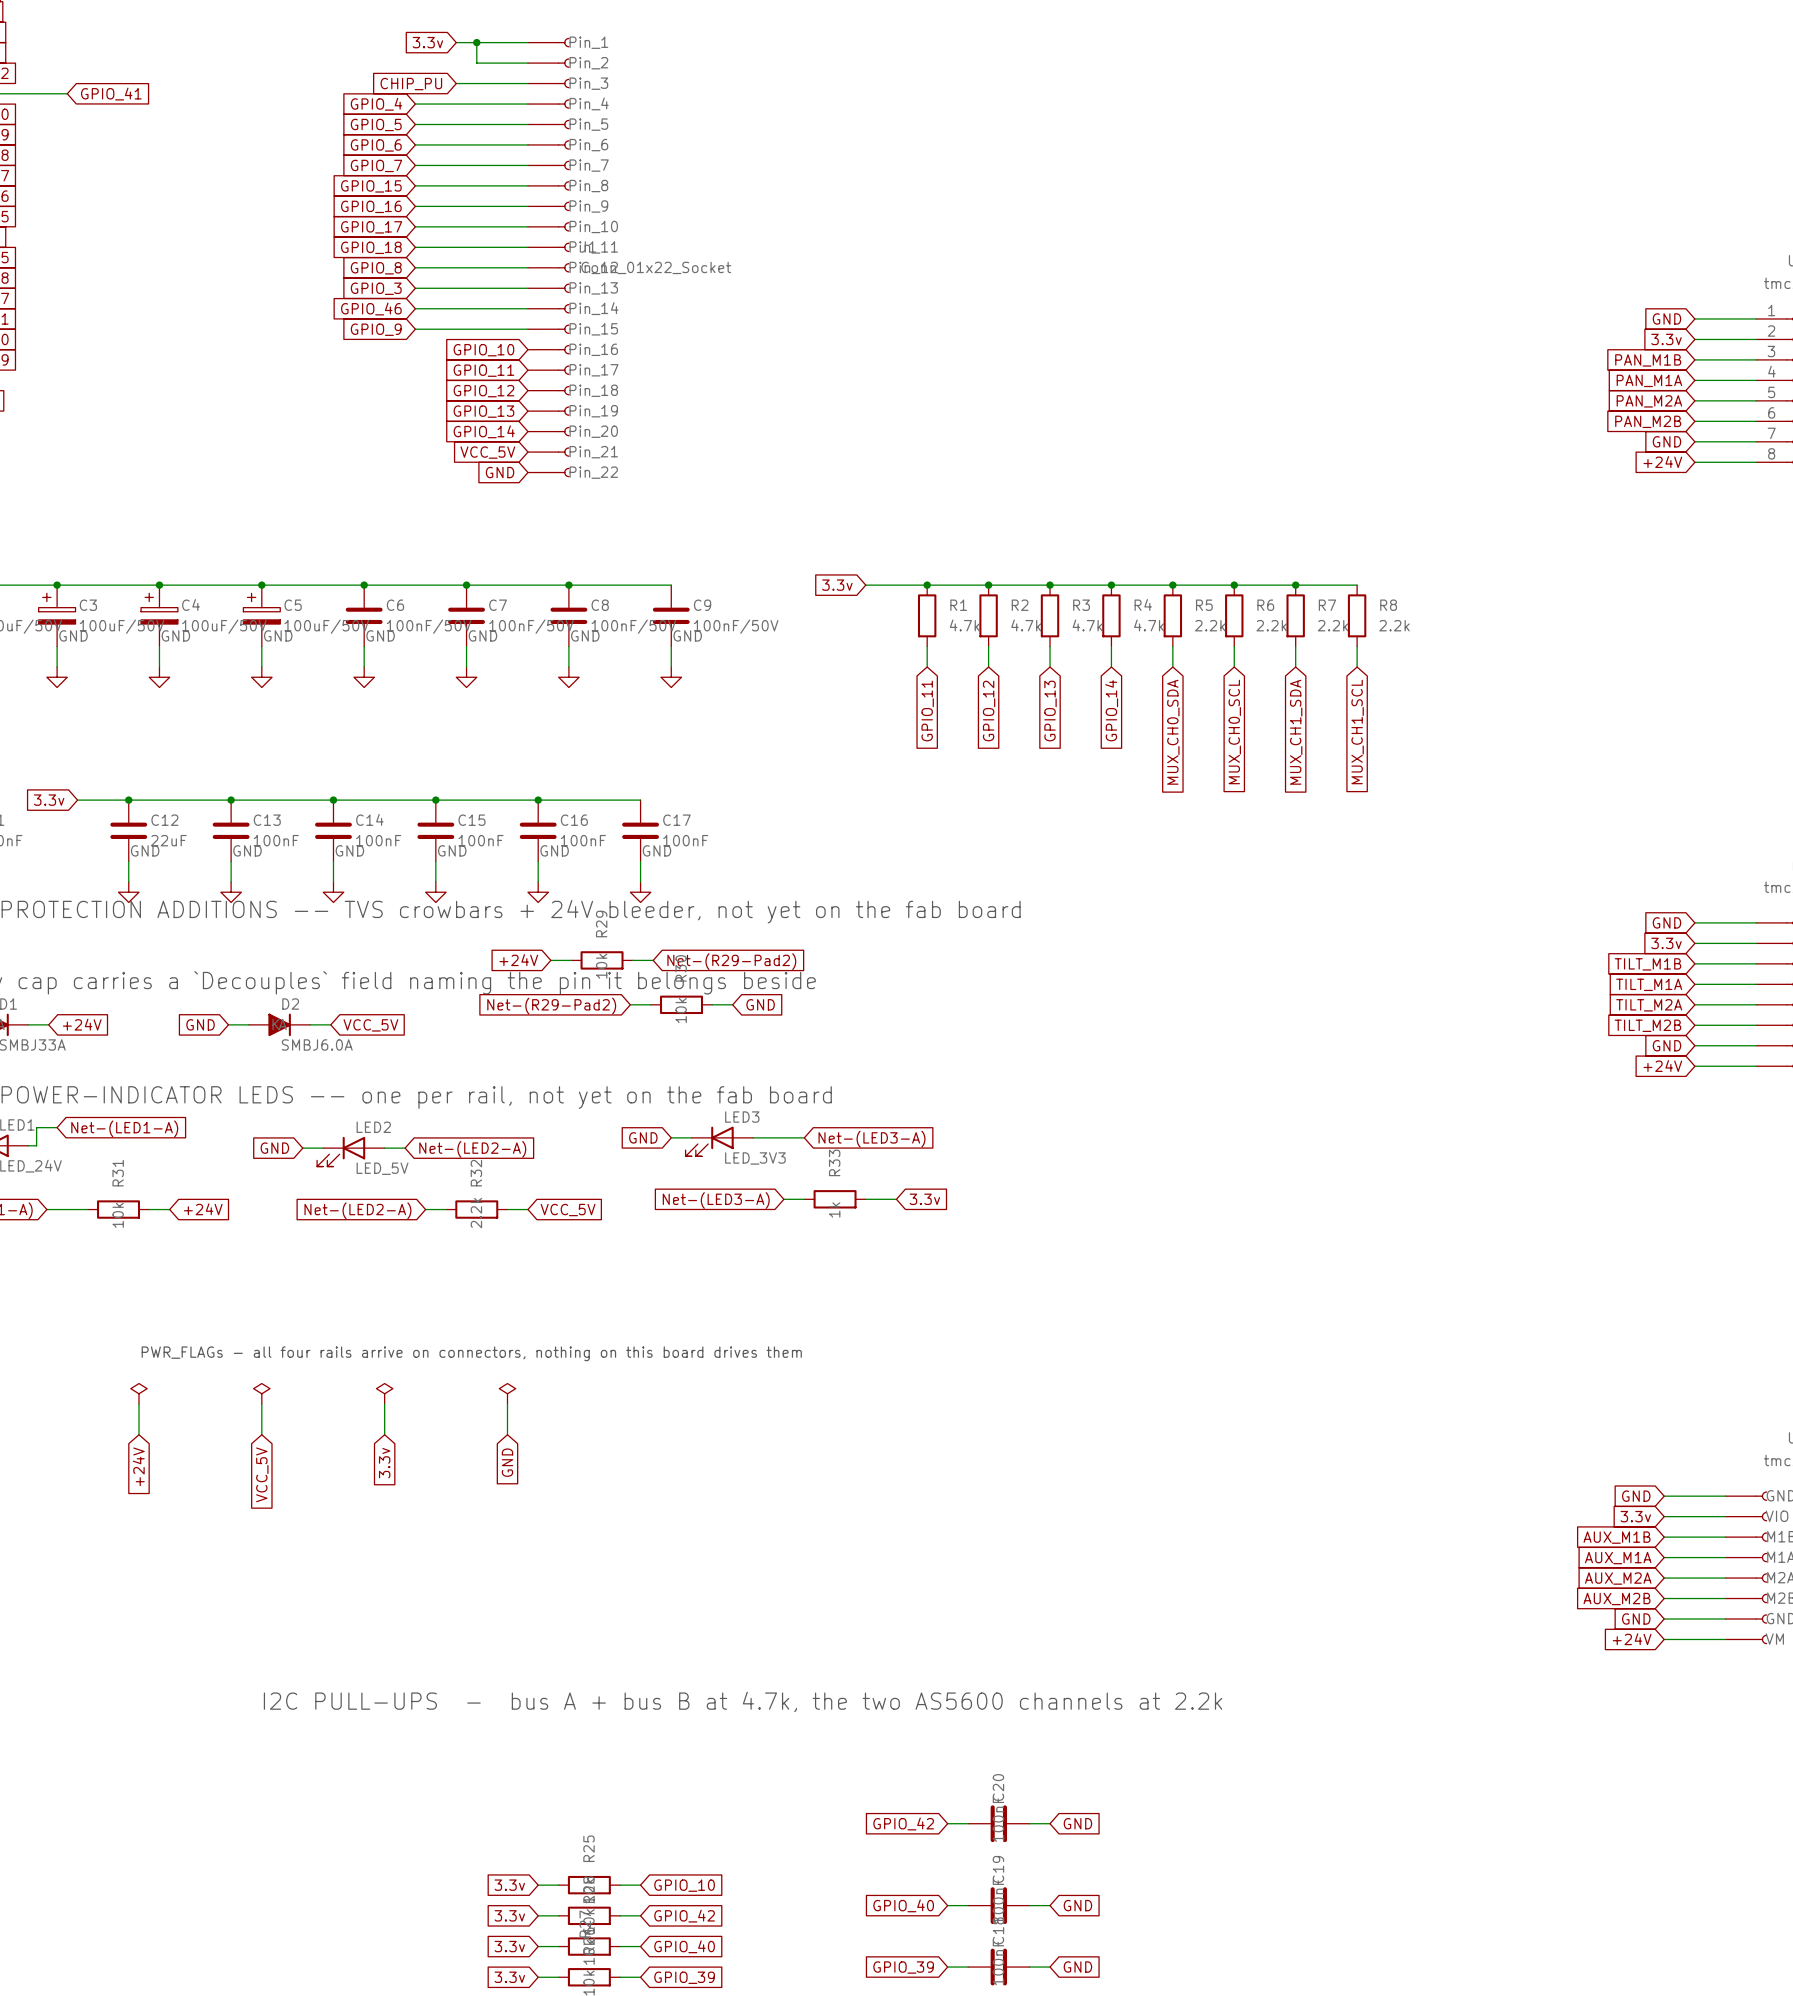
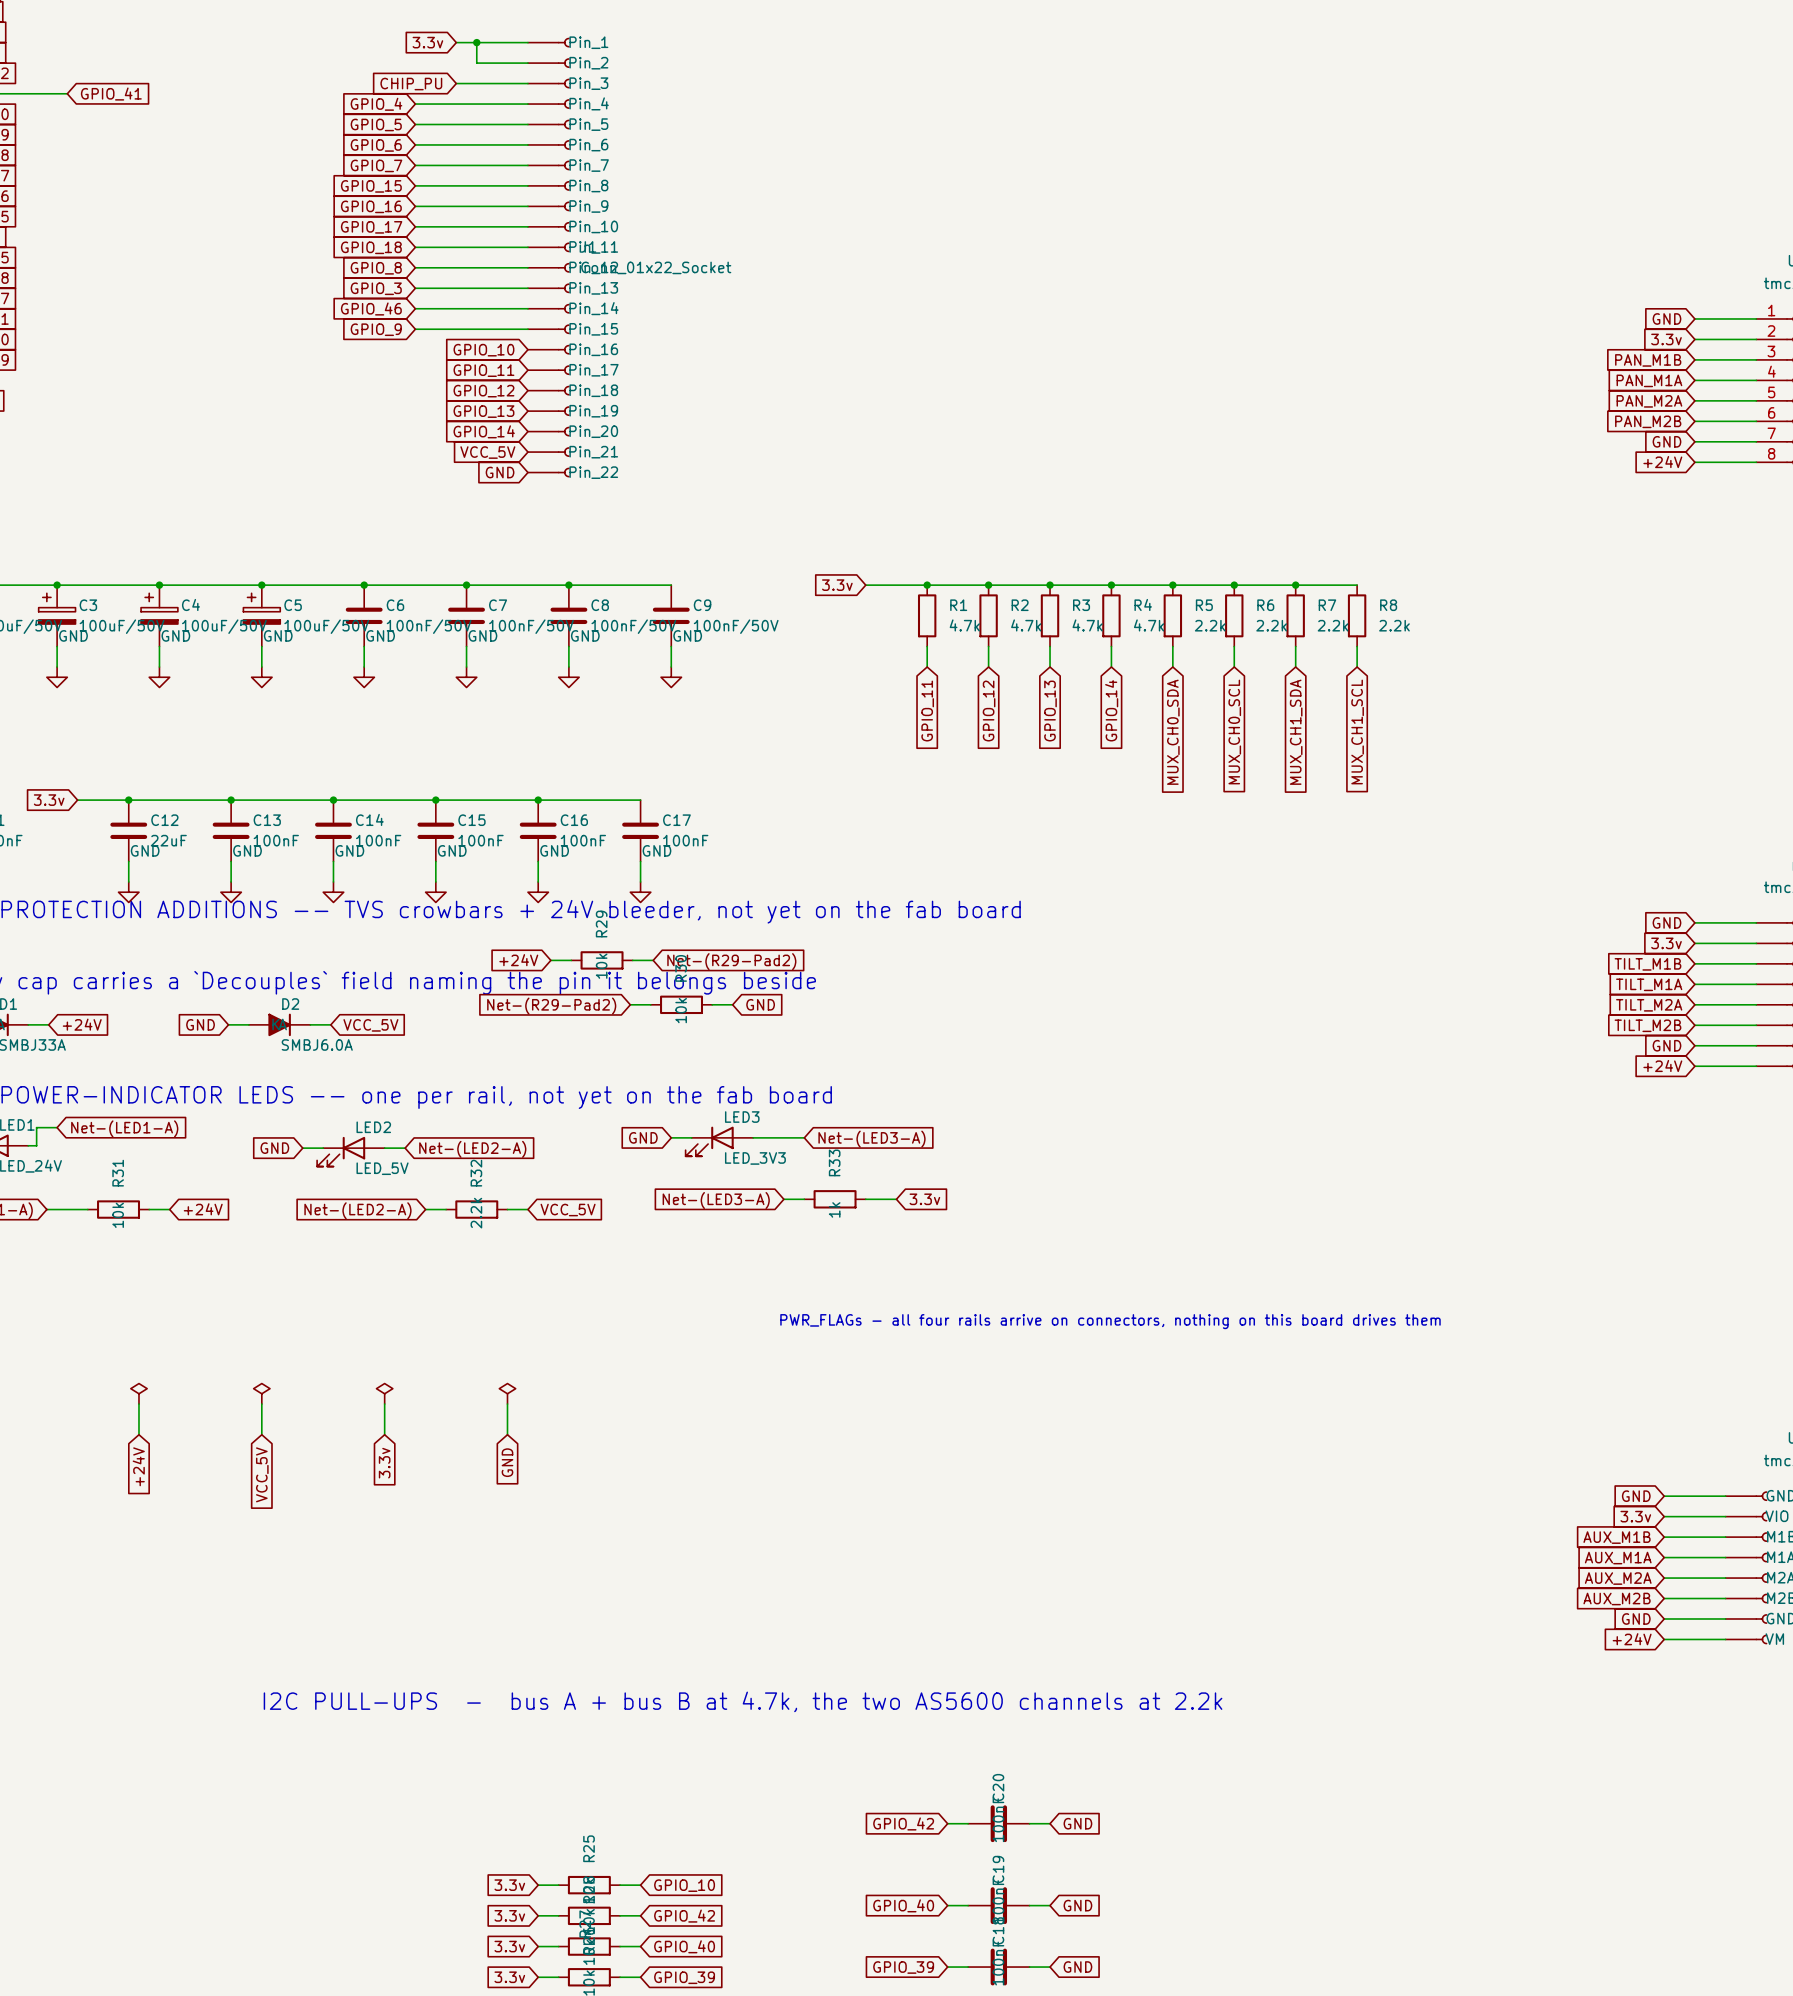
text: none -> PWR_FLAGs - all four rails arrive on connectors, nothing on this board drives them (1110, 1321)
text: PWR_FLAGs - all four rails arrive on connectors, nothing on this board drives them (471, 1353) -> none

